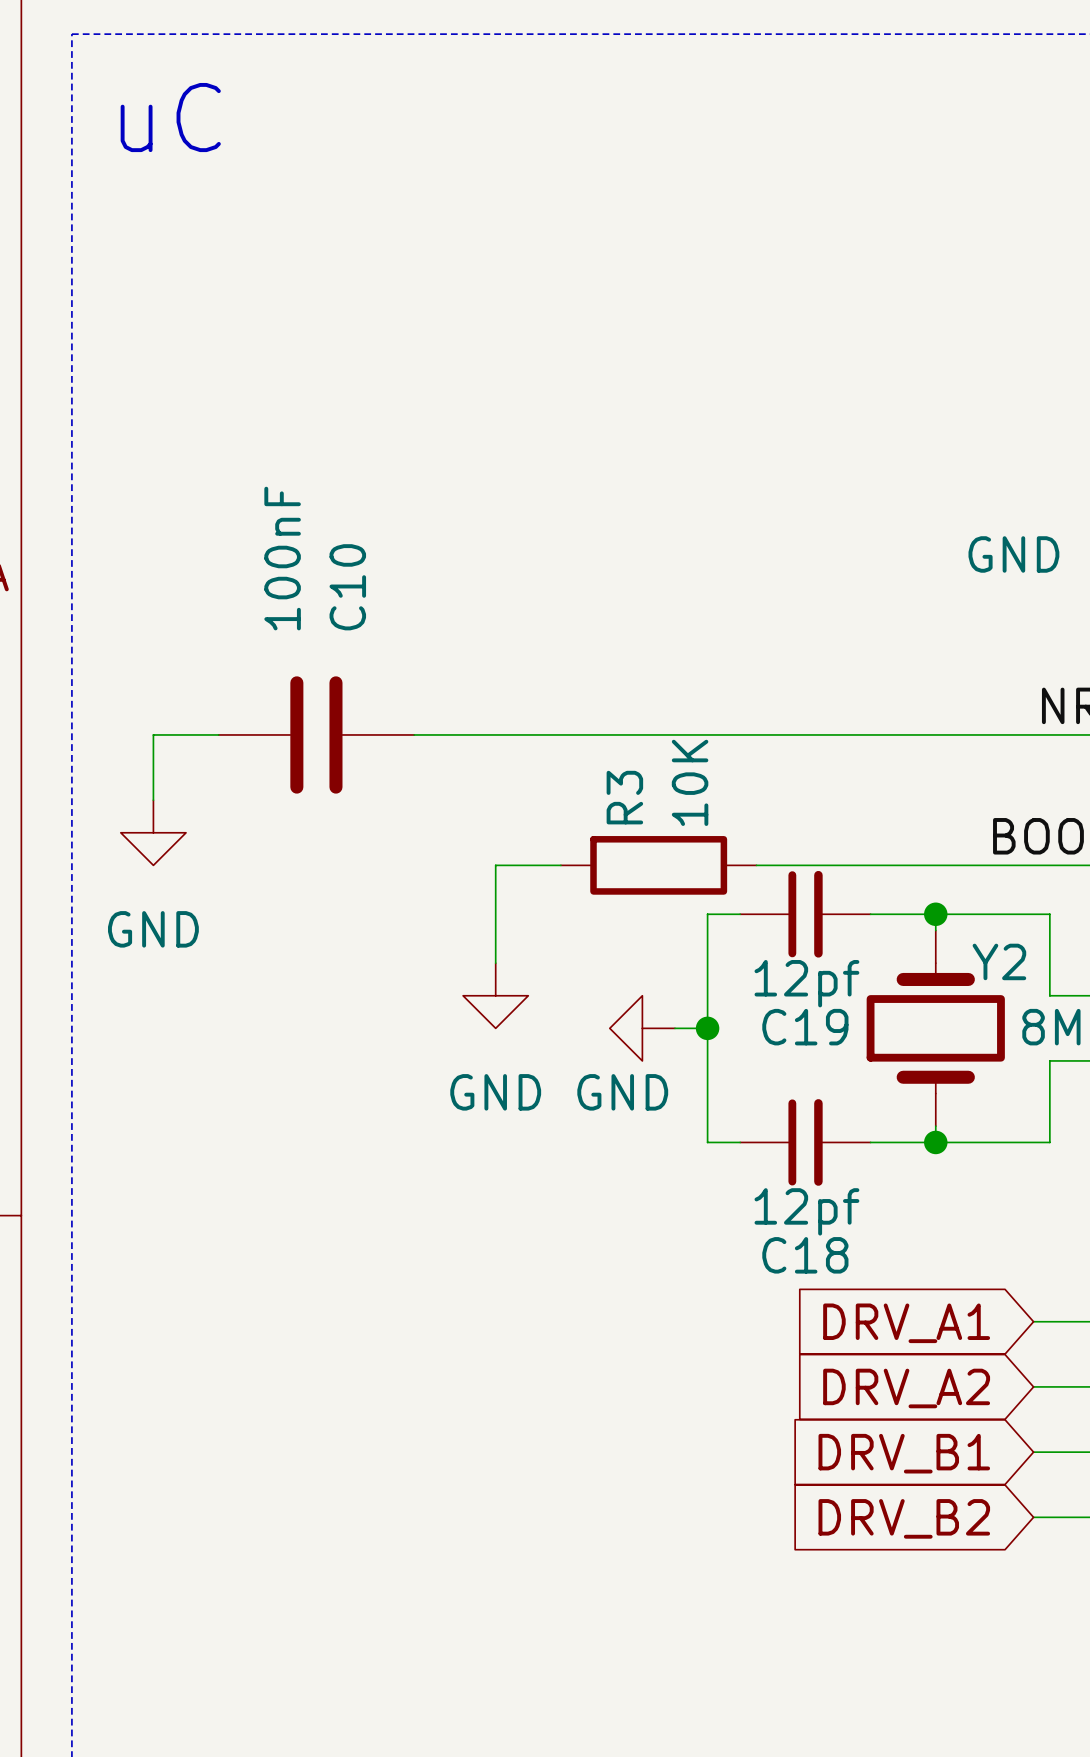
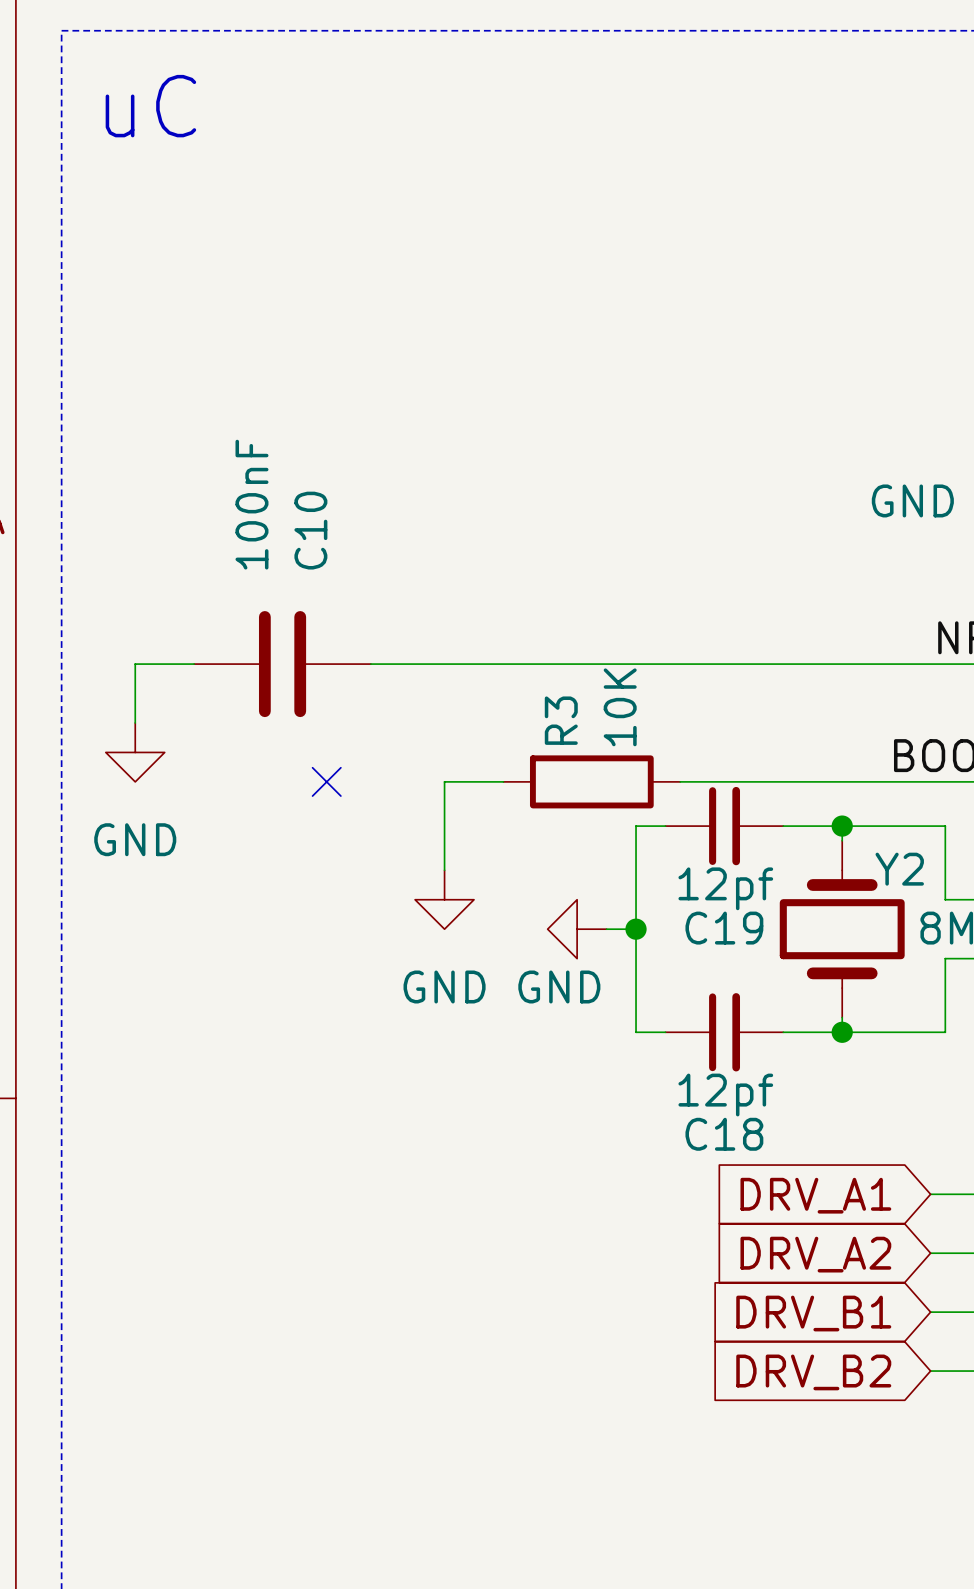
no-connect mark: none -> (326, 781)

